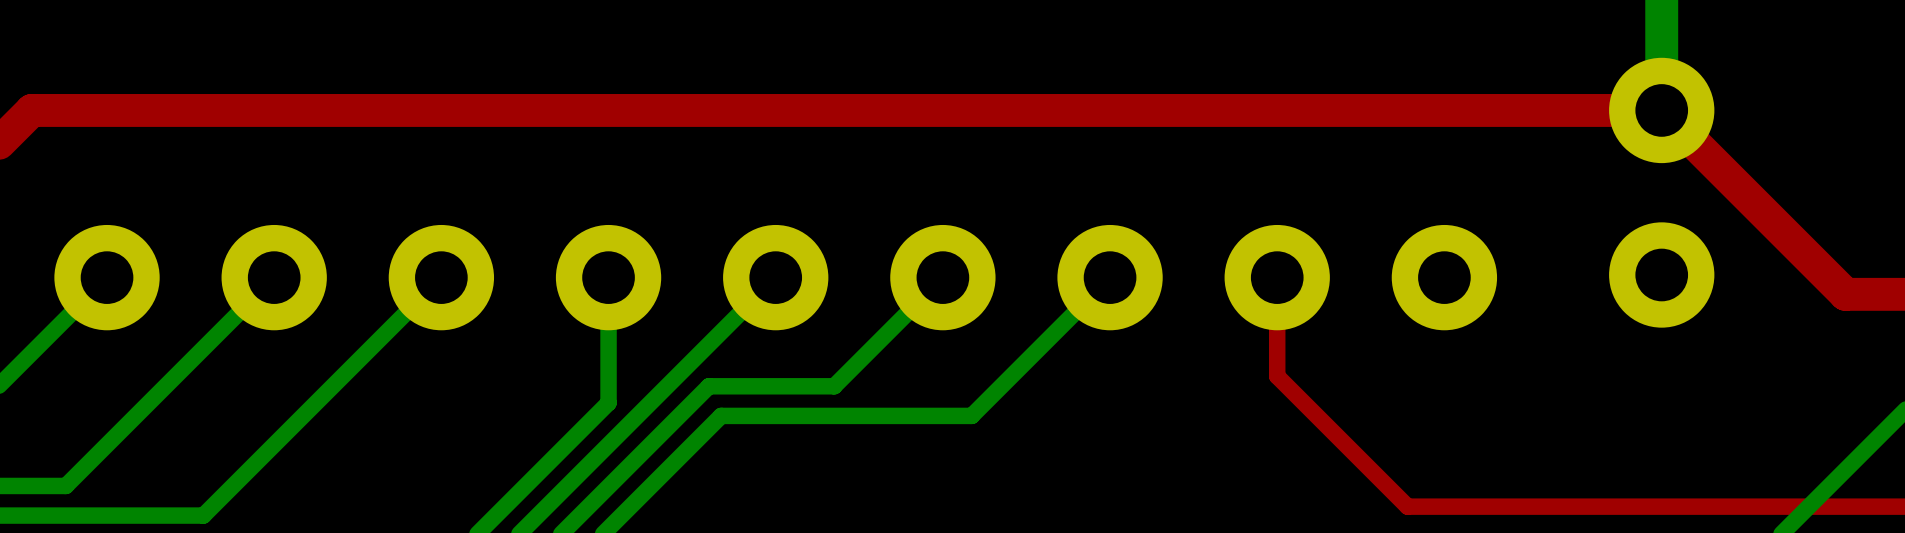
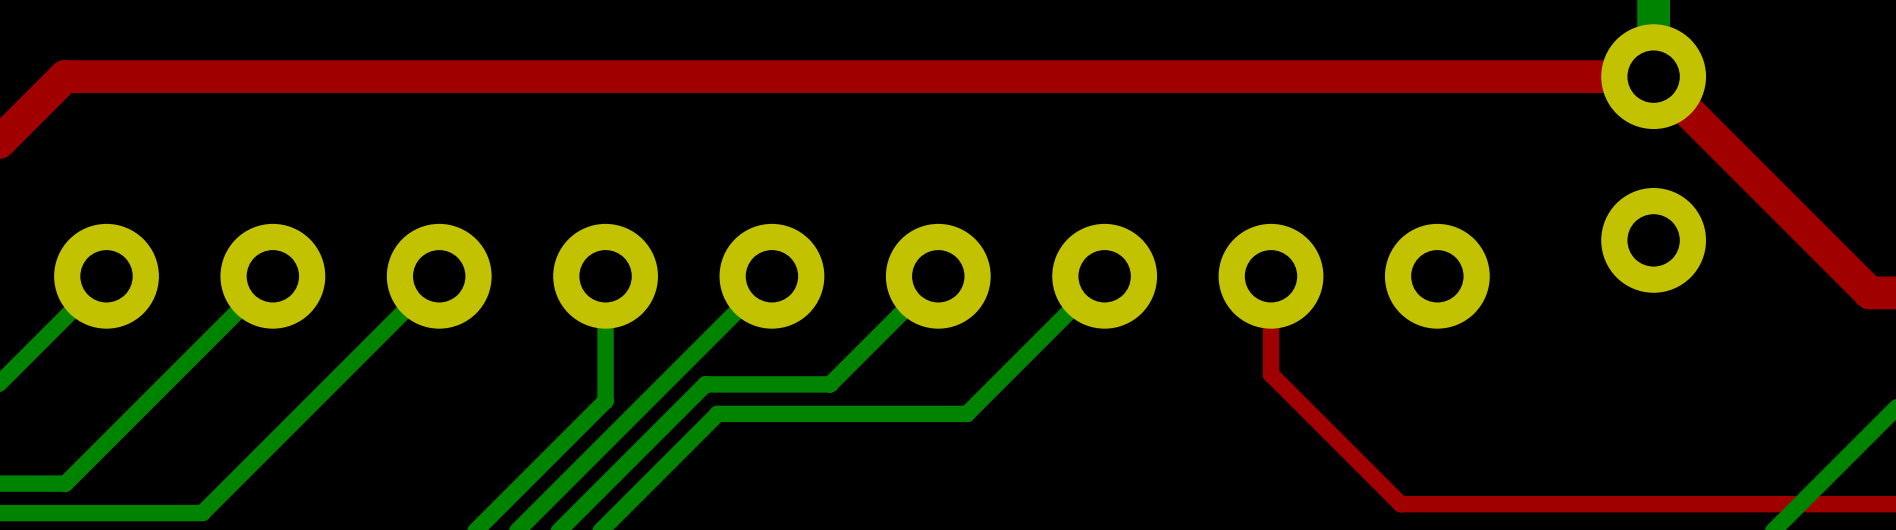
top track: (31, 110) (1661, 110) (1845, 294) (1879, 294) -> (31, 109) (64, 76) (1653, 76) (1869, 292)
part position: (1661, 192) -> (1653, 158)

